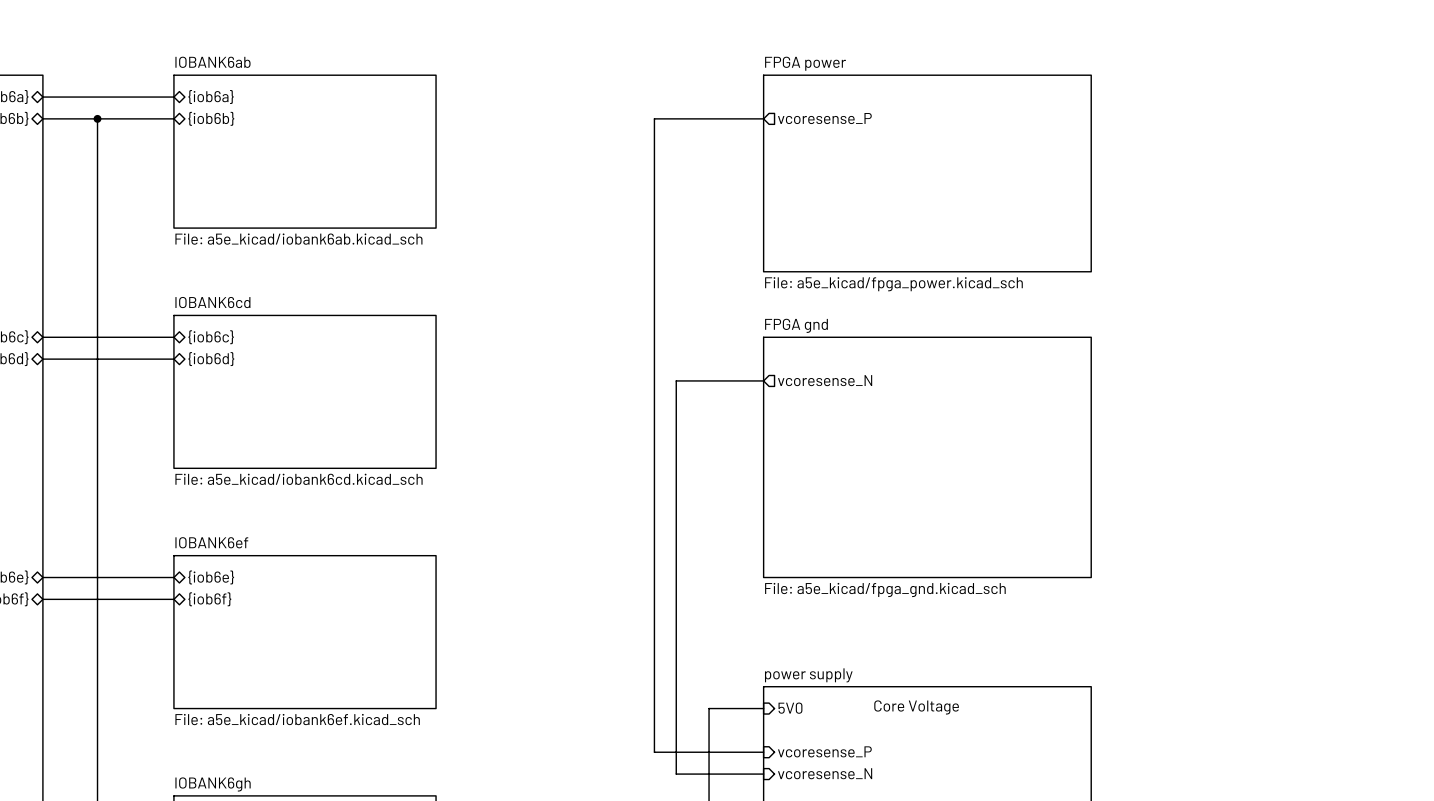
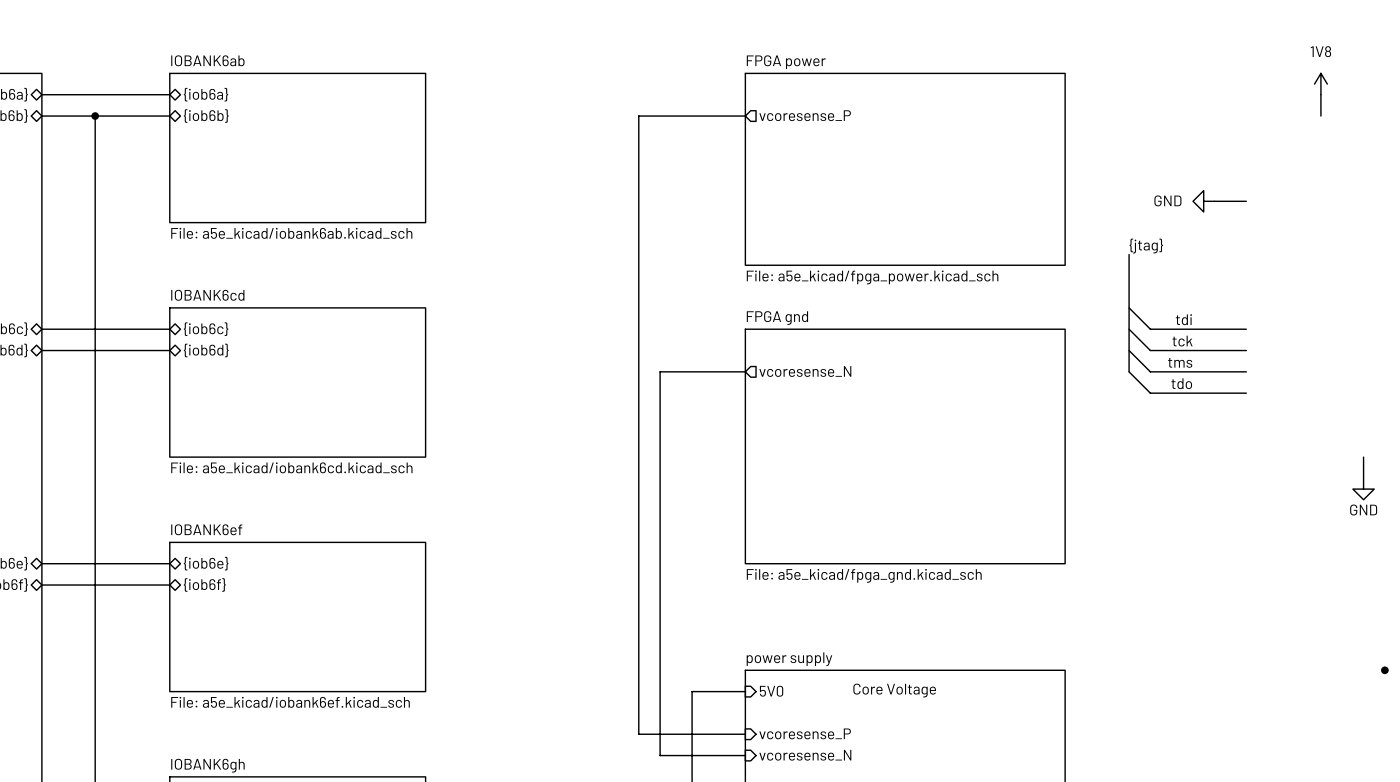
power symbol: none -> 1V8 (1320, 84)
wire: none -> (1320, 94) (1320, 116)
power symbol: none -> GND (1203, 201)
wire: none -> (1214, 201) (1246, 201)
label: none -> {jtag} (1146, 246)
bus: none -> (1129, 254) (1129, 371)
wire: none -> (1129, 307) (1150, 329) (1246, 329)
label: none -> tdi (1183, 319)
wire: none -> (1129, 329) (1150, 350) (1246, 350)
label: none -> tck (1182, 341)
wire: none -> (1129, 350) (1150, 371) (1246, 371)
label: none -> tms (1180, 362)
wire: none -> (1129, 371) (1150, 393) (1246, 393)
label: none -> tdo (1181, 383)
wire: none -> (1363, 457) (1363, 478)
power symbol: none -> GND (1363, 489)
junction: none -> (1384, 670)

